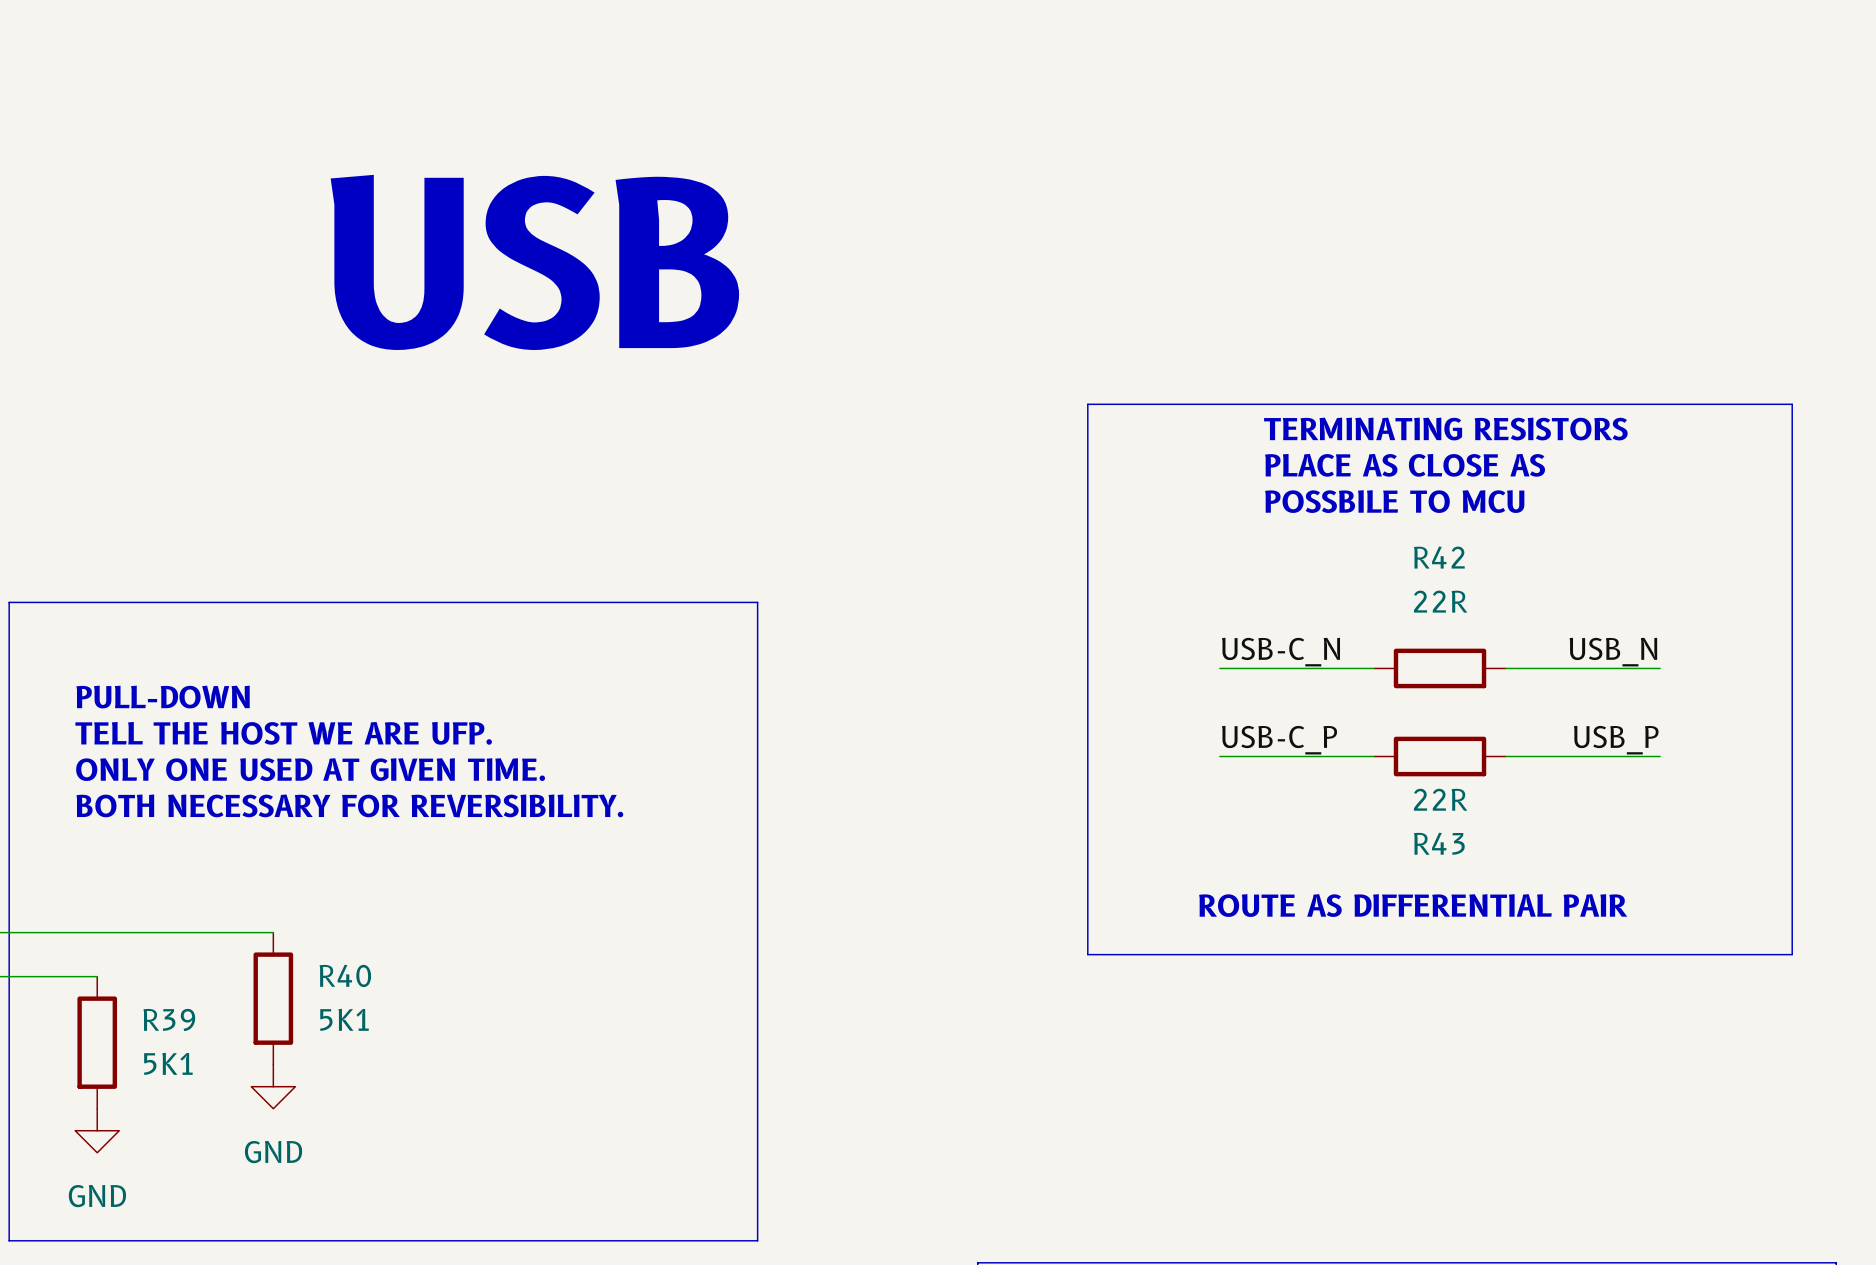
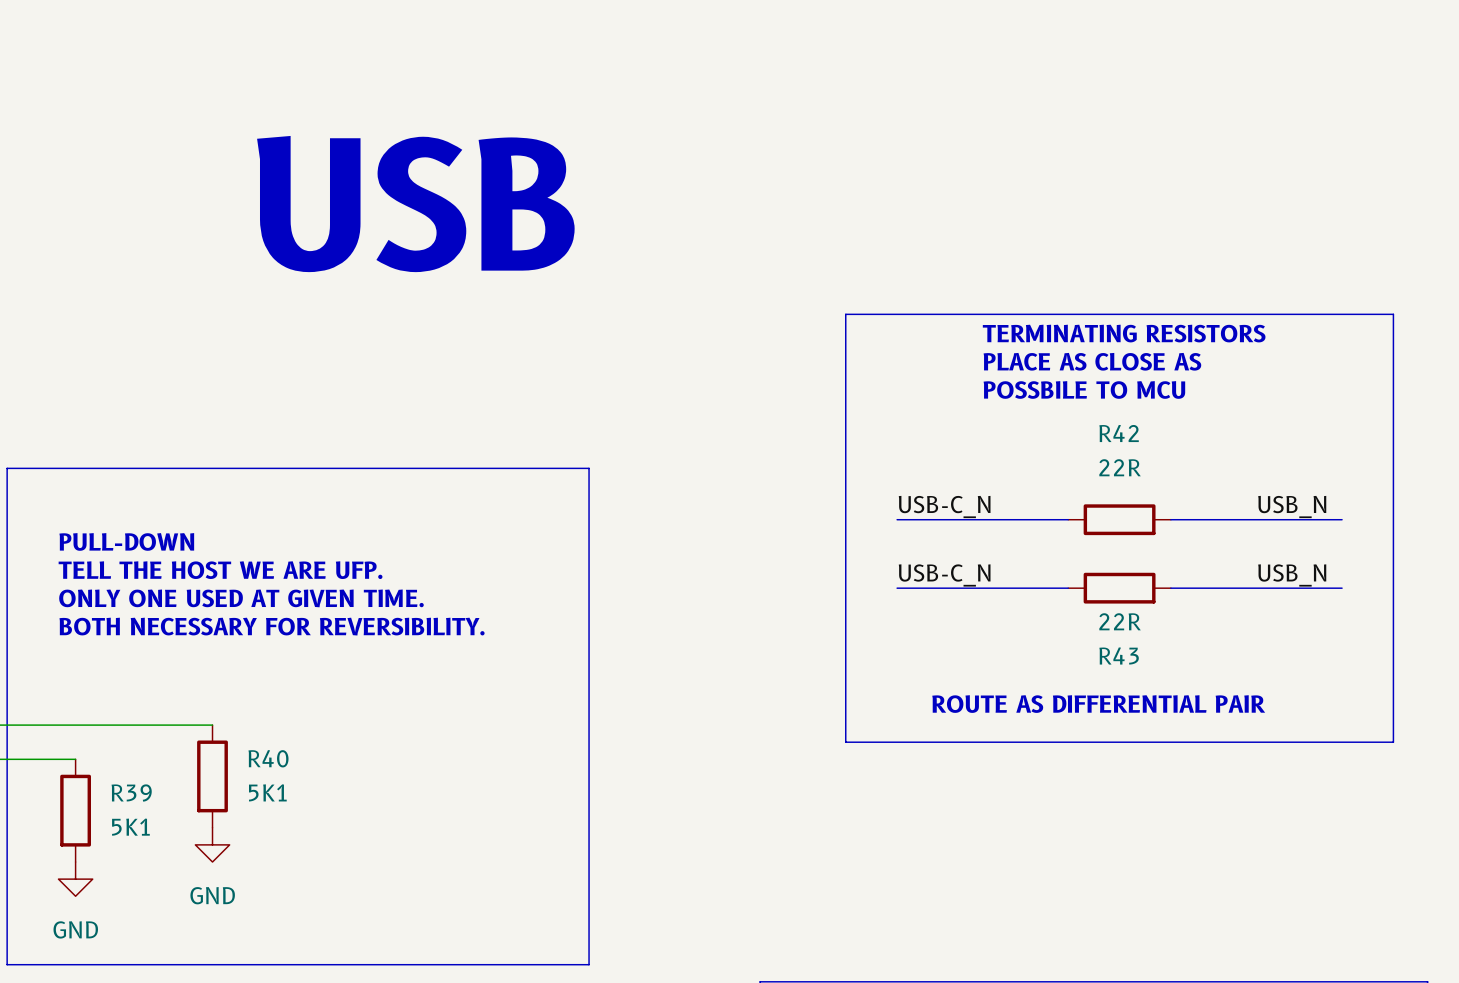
label position: USB-C_N (1281, 652) -> USB-C_N (944, 507)
label position: USB_N (1613, 652) -> USB_N (1292, 507)
bus: none -> (897, 519) (1068, 519)
bus: none -> (1170, 519) (1342, 519)
label: USB-C_P (1279, 740) -> USB-C_N (944, 575)
label: USB_P (1616, 740) -> USB_N (1292, 575)
bus: none -> (897, 588) (1068, 588)
bus: none -> (1170, 588) (1342, 588)

